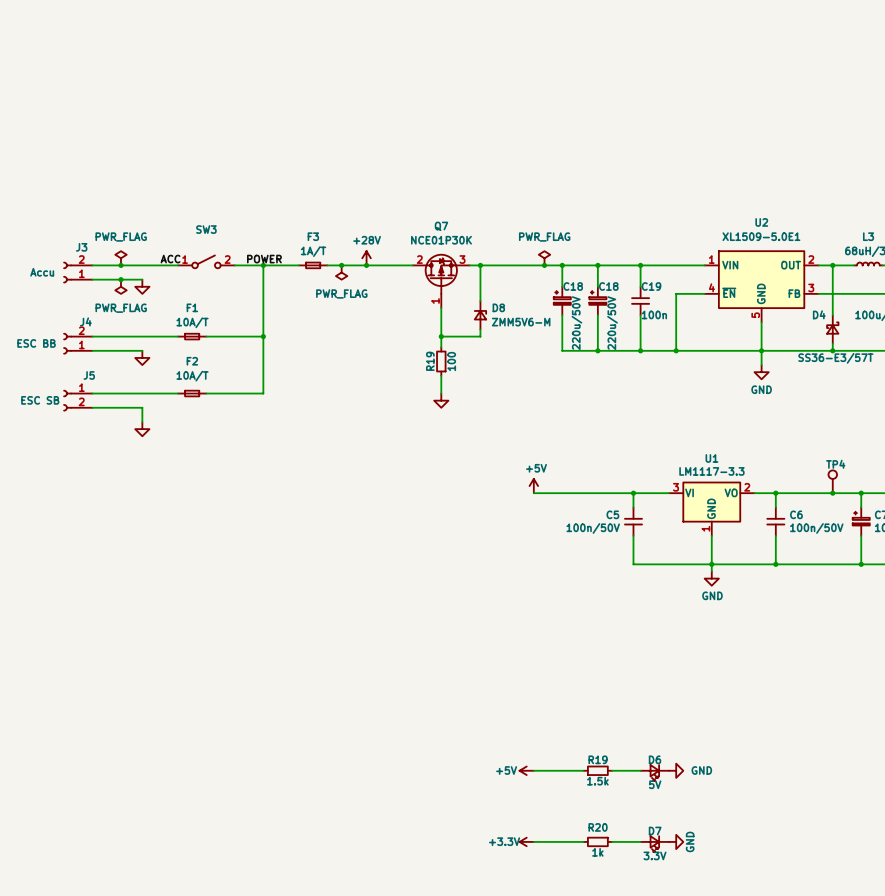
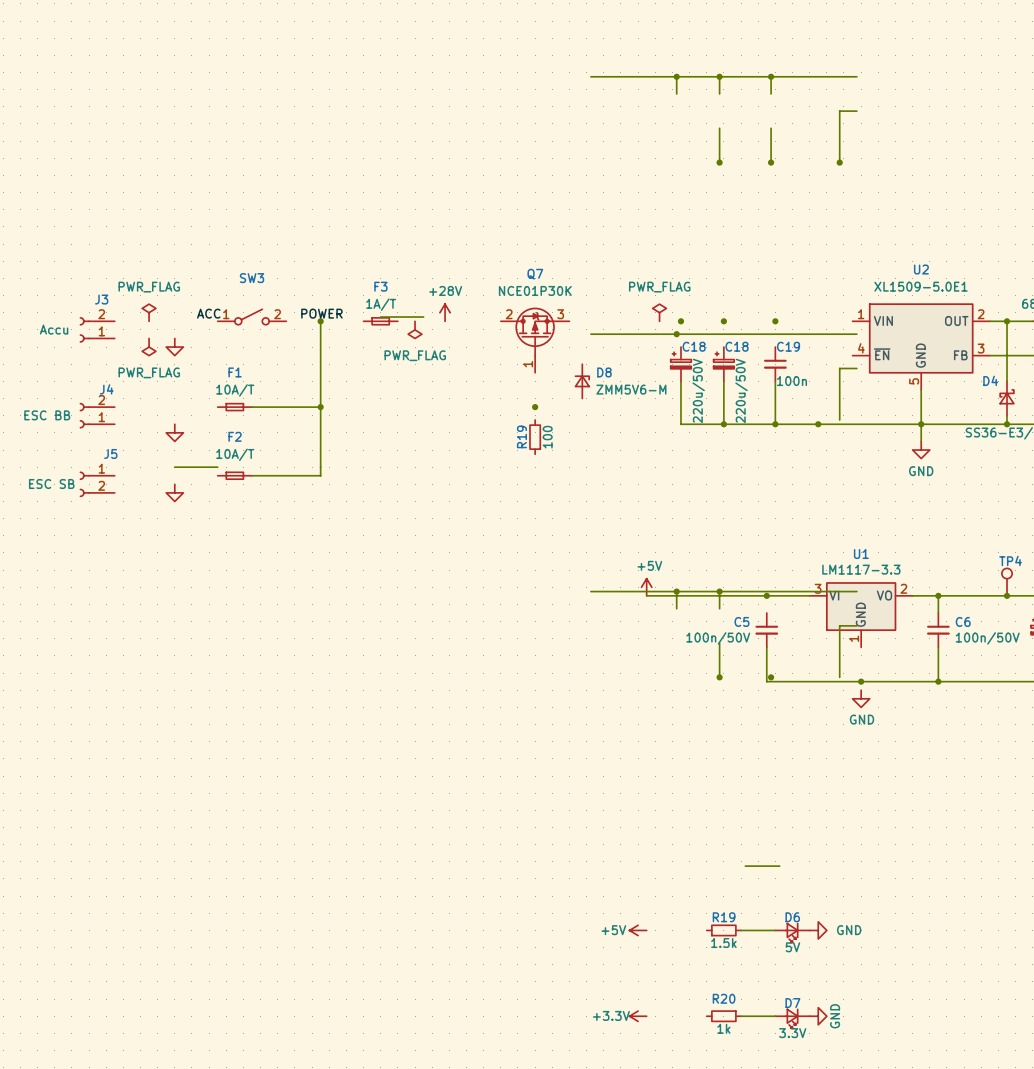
wire: none -> (590, 76) (856, 76)
wire: none -> (676, 76) (676, 93)
junction: none -> (676, 76)
wire: none -> (719, 76) (719, 93)
junction: none -> (719, 76)
wire: none -> (771, 76) (771, 93)
junction: none -> (771, 76)
wire: none -> (856, 111) (839, 111) (839, 162)
wire: none -> (719, 128) (719, 162)
wire: none -> (771, 128) (771, 162)
junction: none -> (719, 162)
junction: none -> (771, 162)
junction: none -> (839, 162)
wire: none -> (380, 317) (423, 317)
wire: (92, 265) (177, 265) -> none
junction: (121, 265) -> none
wire: (234, 265) (298, 265) -> none
wire: (327, 265) (412, 265) -> none
junction: (341, 265) -> none
junction: (366, 265) -> none
wire: (469, 265) (704, 265) -> none
wire: (480, 265) (480, 301) -> none
junction: (480, 265) -> none
junction position: (544, 265) -> (676, 334)
wire: (562, 265) (562, 286) -> none
wire: (597, 265) (597, 286) -> none
wire: (640, 265) (640, 286) -> none
wire: none -> (590, 334) (856, 334)
wire: (92, 279) (142, 279) -> none
junction: (121, 279) -> none
wire: (704, 293) (676, 293) (676, 350) -> none
wire: none -> (856, 368) (839, 368) (839, 419)
wire: (441, 308) (441, 347) -> none
wire: (480, 329) (480, 336) (441, 336) -> none
wire: (92, 336) (177, 336) -> none
wire: (92, 350) (142, 350) -> none
wire: (441, 375) (441, 393) -> none
wire: none -> (174, 467) (217, 467)
wire: (92, 393) (177, 393) -> none
power symbol: (441, 400) -> none
wire: (92, 407) (142, 407) (142, 422) -> none
power symbol position: (142, 429) -> (174, 492)
wire: none -> (590, 591) (856, 591)
wire: none -> (676, 591) (676, 608)
junction: none -> (676, 591)
junction: none -> (719, 591)
wire: (633, 493) (633, 507) -> (719, 591) (719, 608)
wire: none -> (856, 625) (839, 625) (839, 677)
wire: none -> (719, 643) (719, 677)
wire: (711, 535) (711, 571) -> none
junction: none -> (719, 677)
junction: none -> (771, 677)
wire: none -> (745, 866) (779, 866)
wire: (533, 770) (583, 770) -> none
wire: (533, 841) (583, 841) -> none

